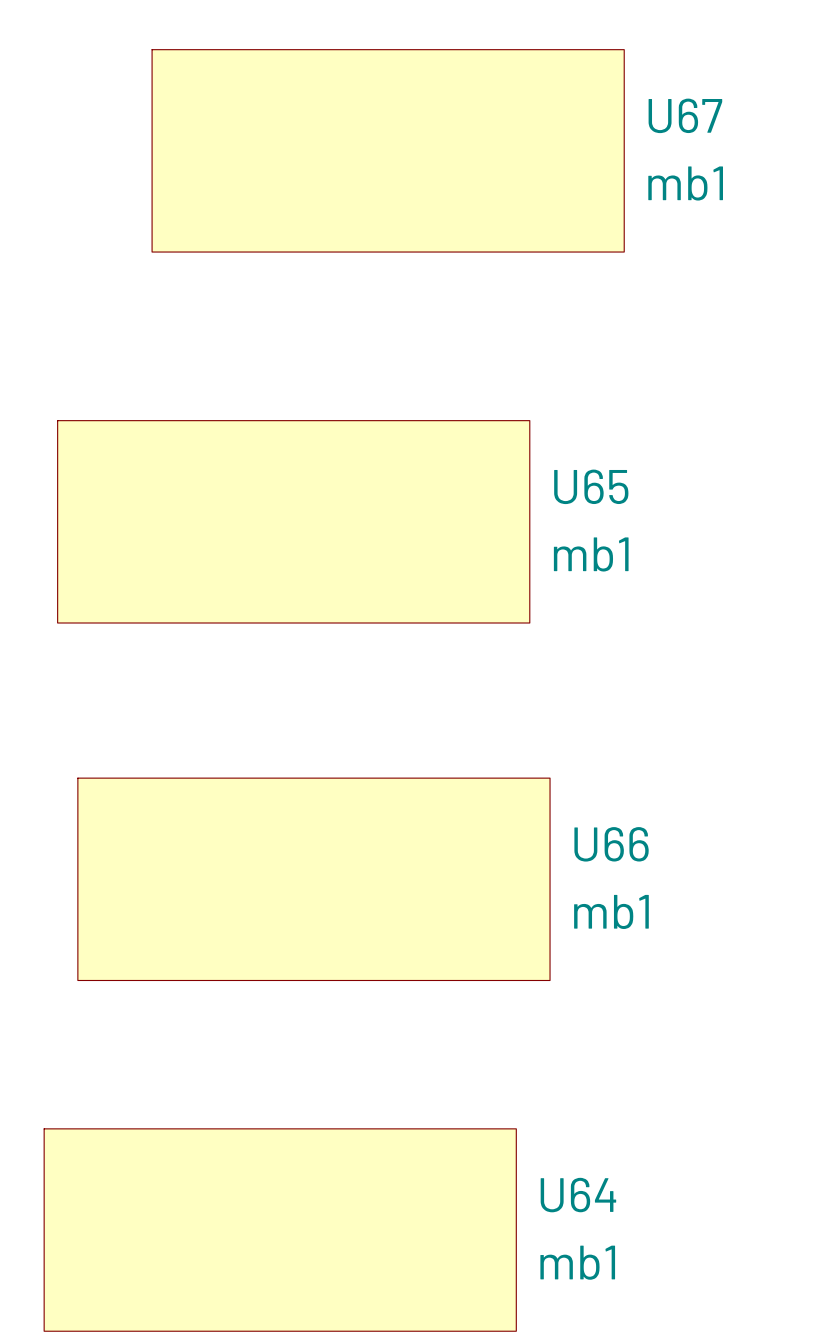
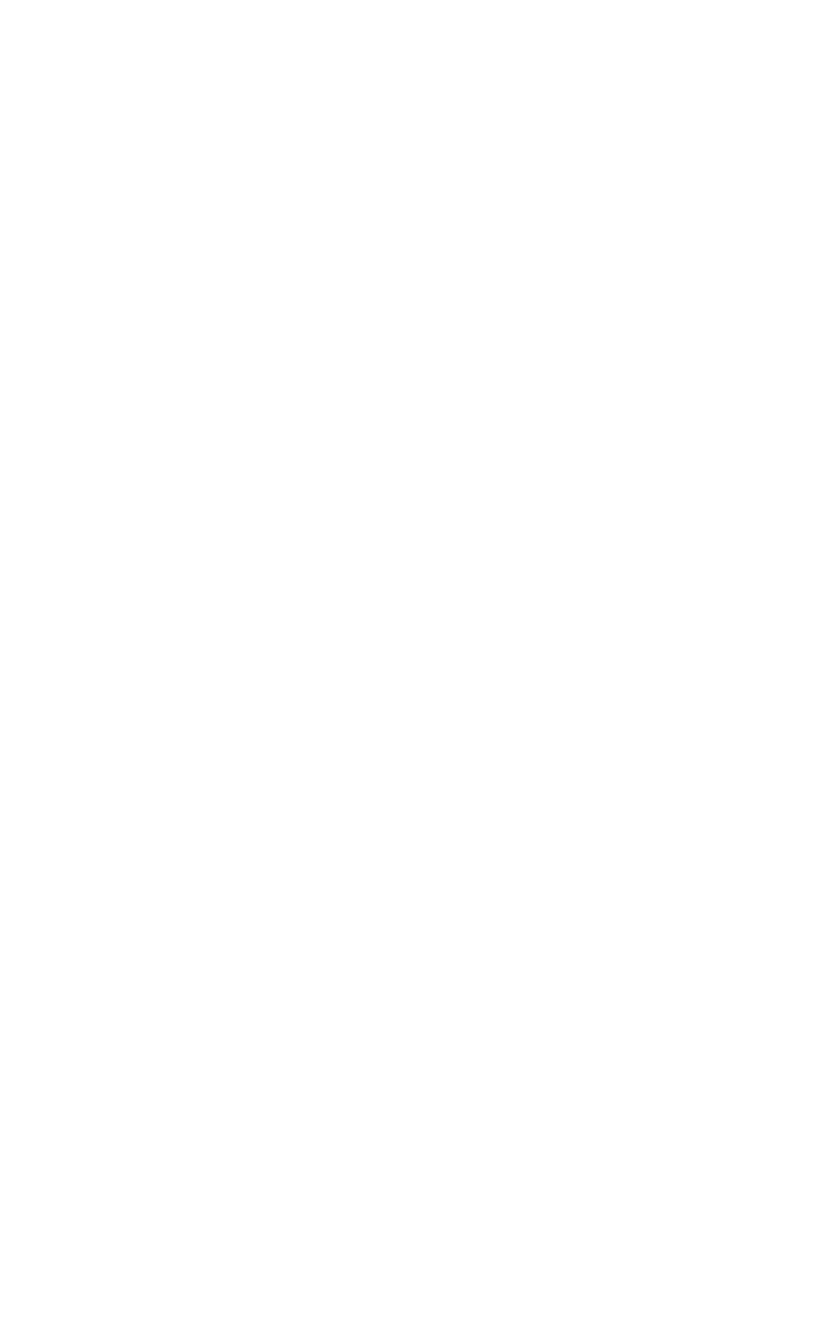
U67: mb1 (388, 150) -> none
U65: mb1 (293, 521) -> none
U66: mb1 (313, 879) -> none
U64: mb1 (280, 1230) -> none

